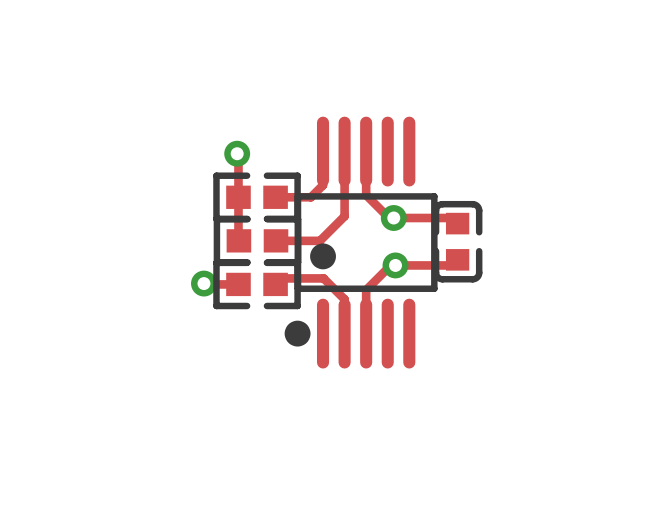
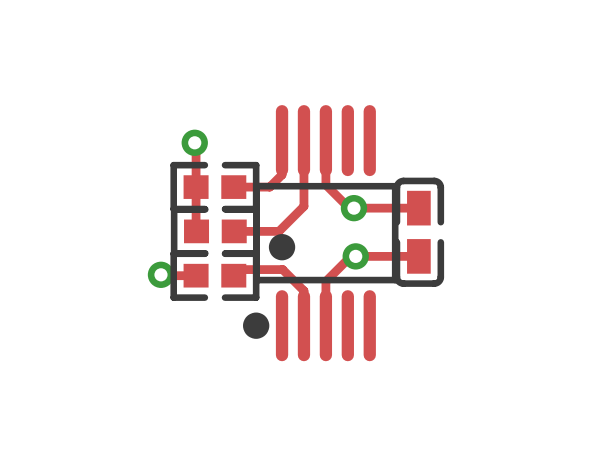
part footprint: [432, 200, 483, 283] -> [393, 177, 445, 287]

